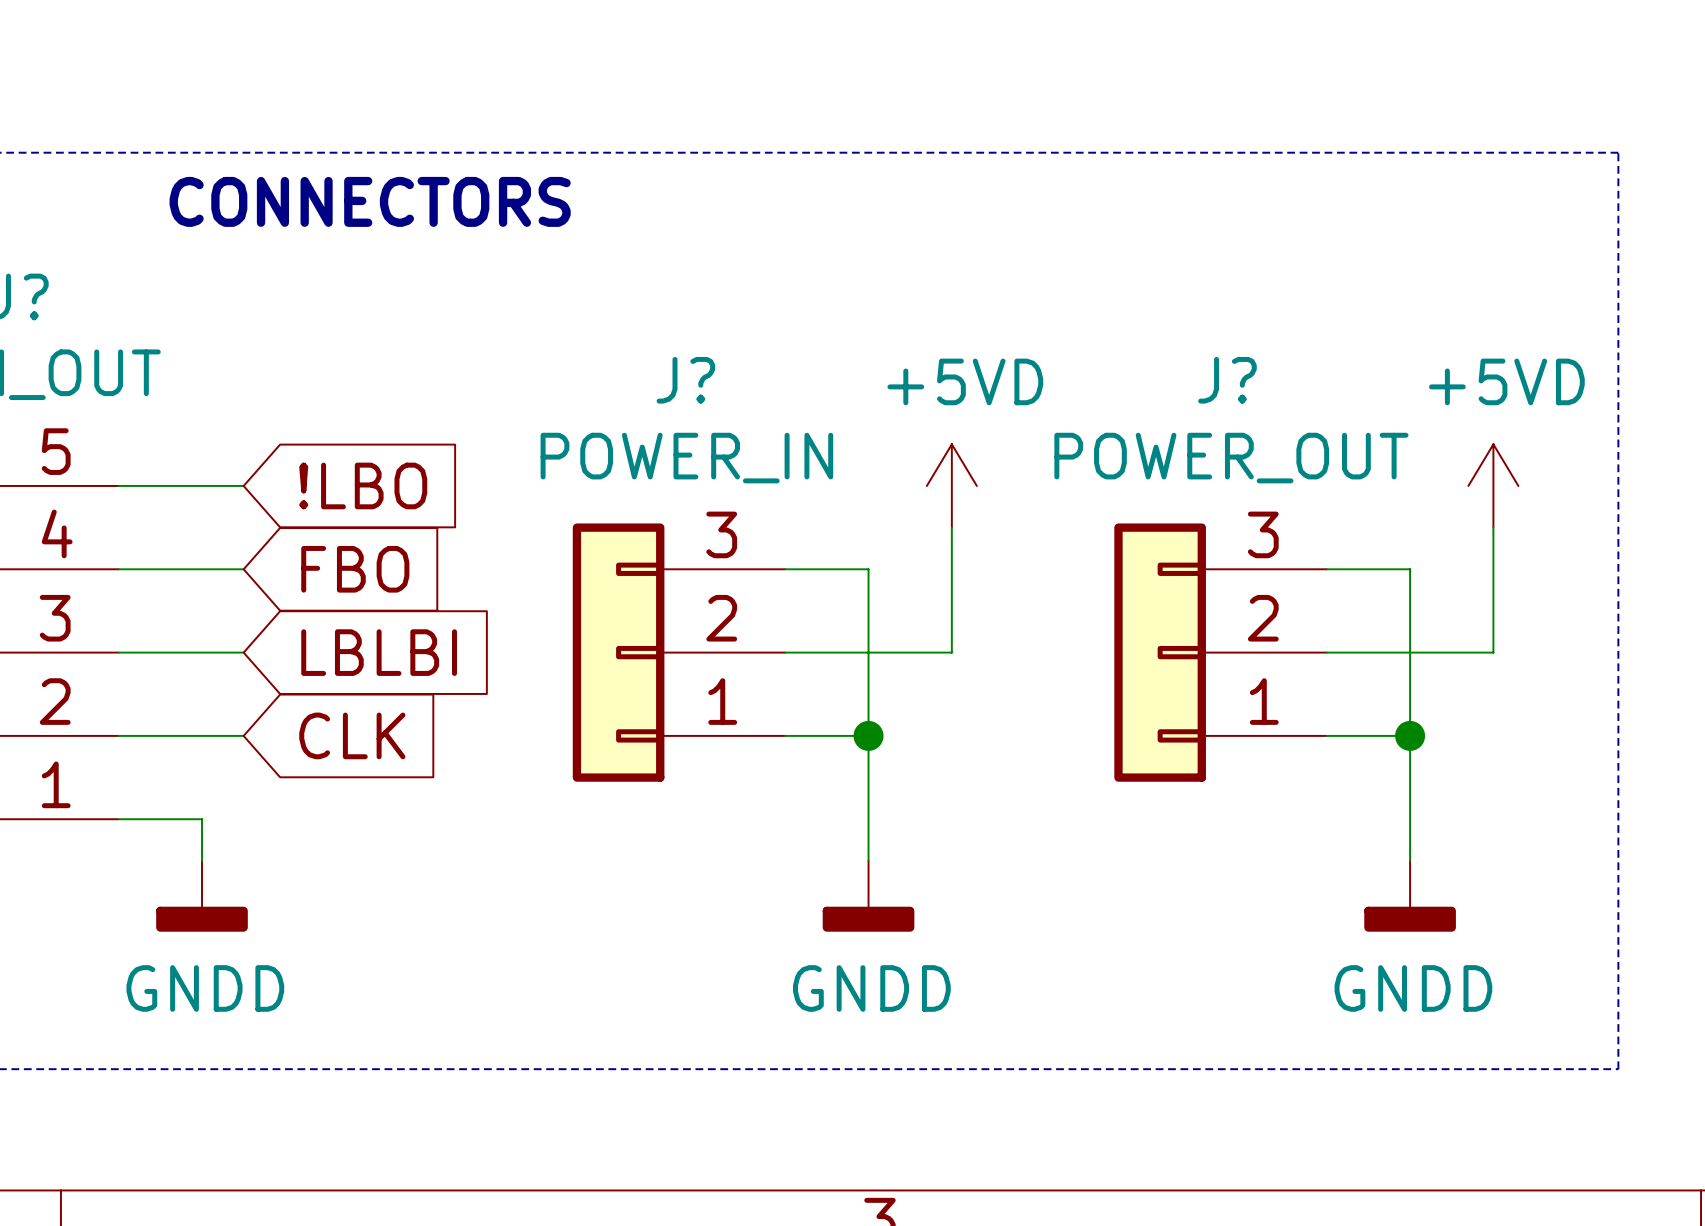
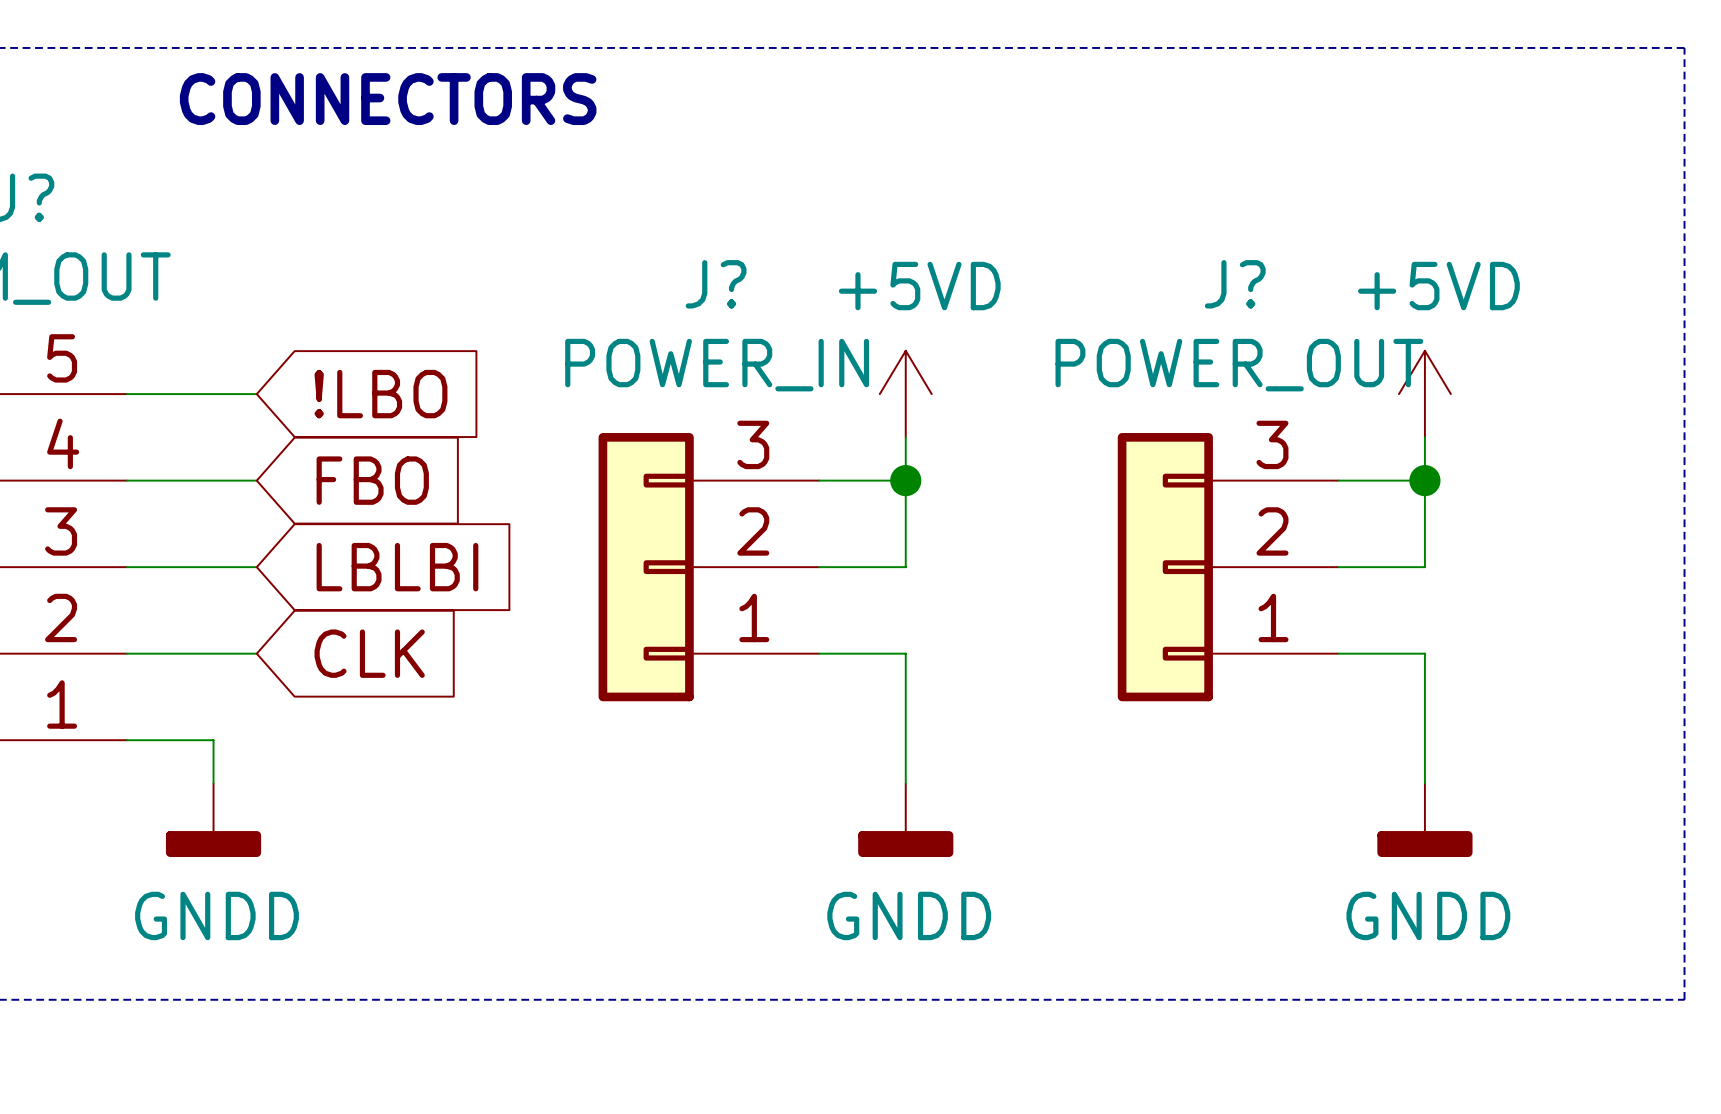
power symbol position: +5VD (951, 485) -> +5VD (905, 394)
power symbol position: +5VD (1493, 485) -> +5VD (1424, 394)
wire: none -> (905, 437) (905, 480)
wire: (951, 527) (951, 652) (868, 652) (868, 735) -> none
wire: (1493, 527) (1493, 652) (1368, 652) -> (1424, 437) (1424, 567)
wire: (1368, 569) (1410, 569) (1410, 860) -> none
J? position: (1220, 652) -> (1228, 567)
junction position: (868, 735) -> (905, 480)
wire: (1368, 735) (1410, 735) -> (1424, 653) (1424, 783)
junction position: (1410, 735) -> (1424, 480)
power symbol position: GNDD (1410, 896) -> GNDD (1424, 820)

